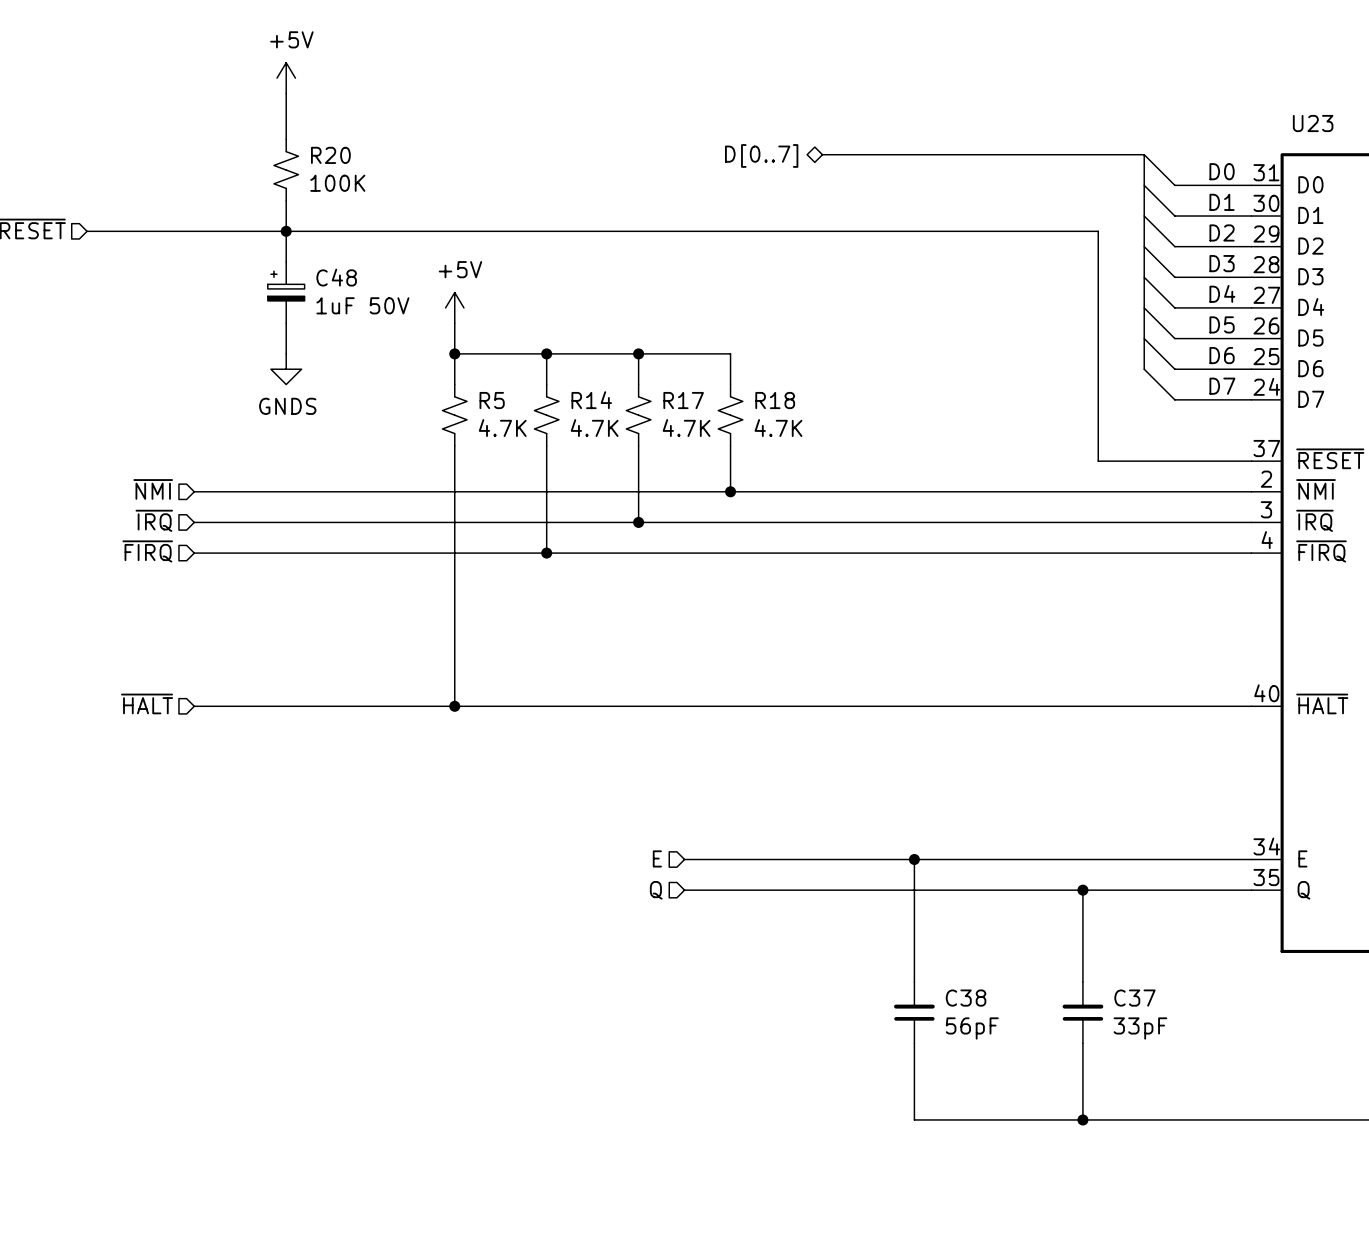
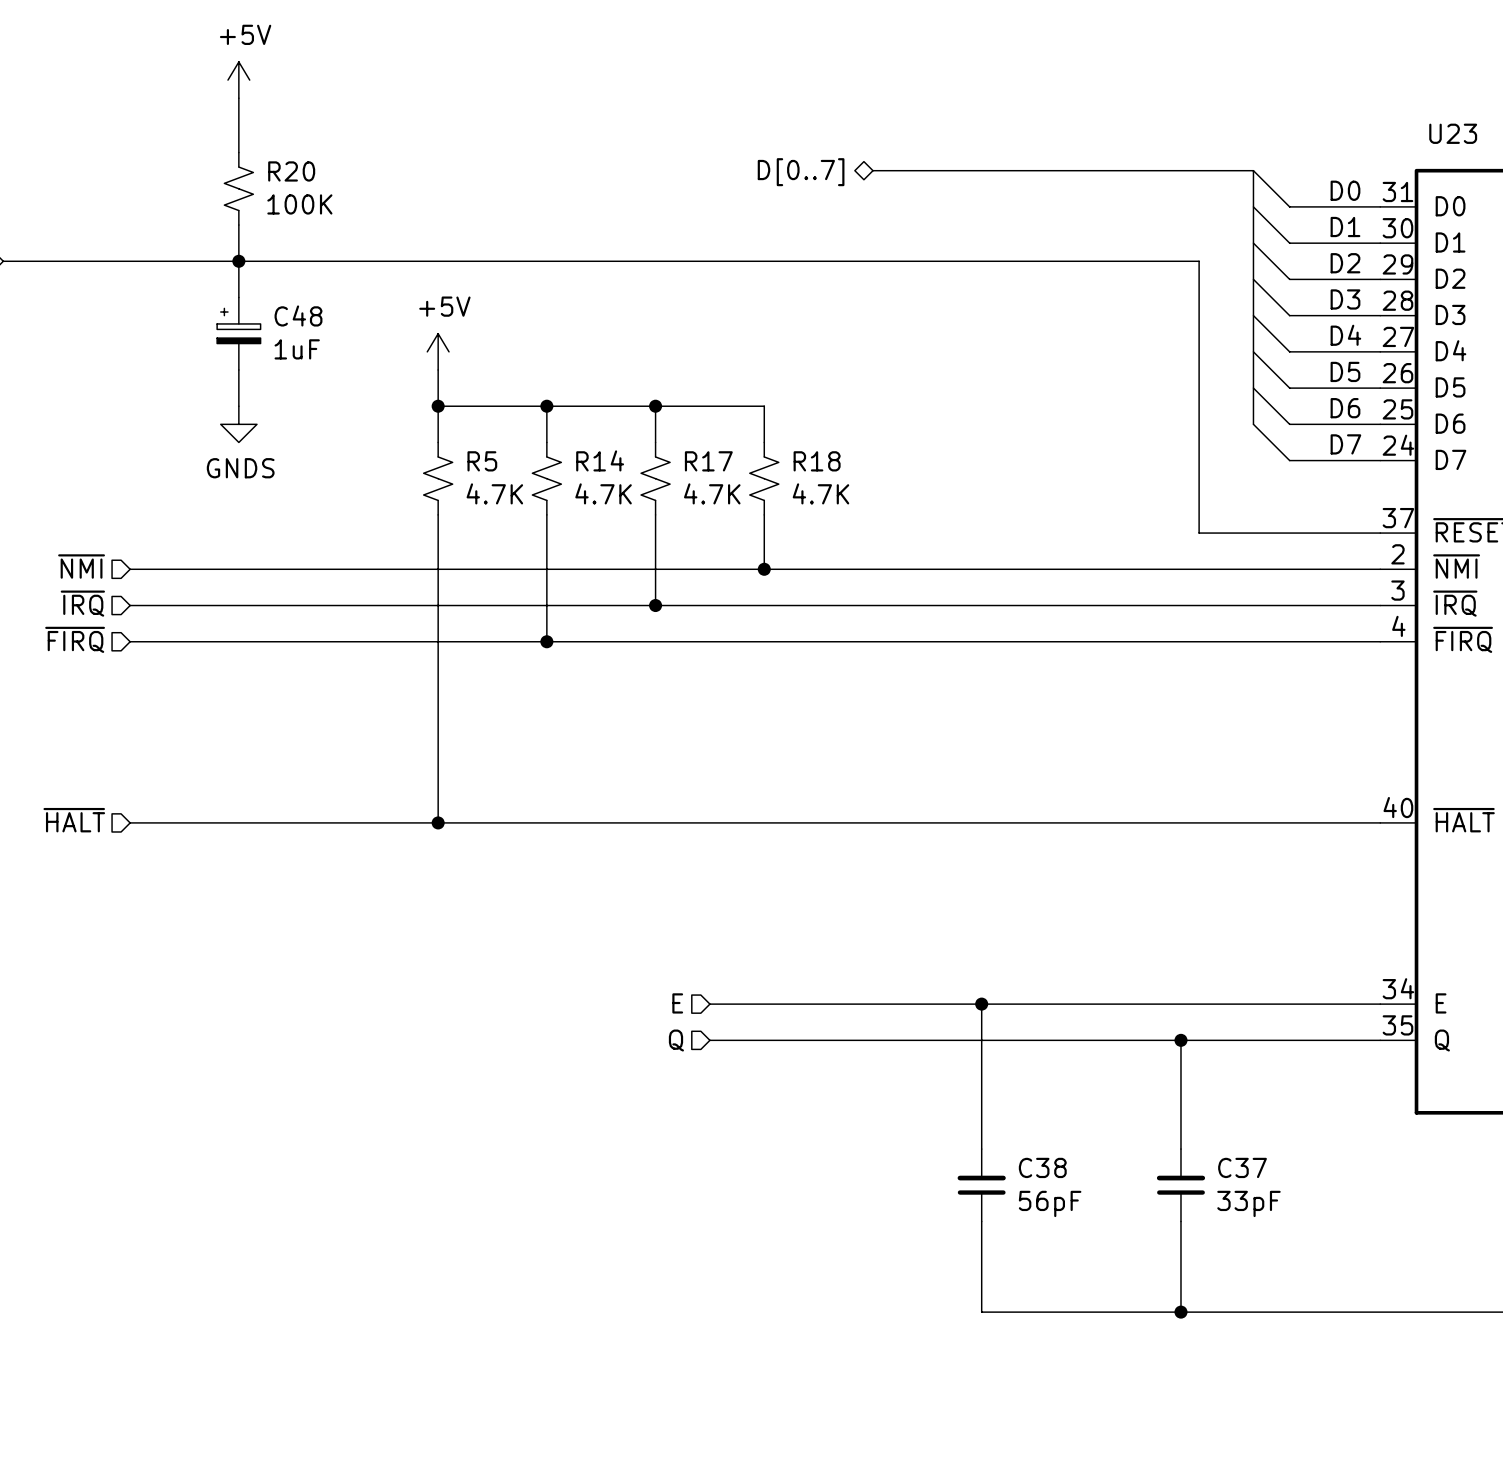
C48 value: 1uF 50V (362, 305) -> 1uF (297, 349)

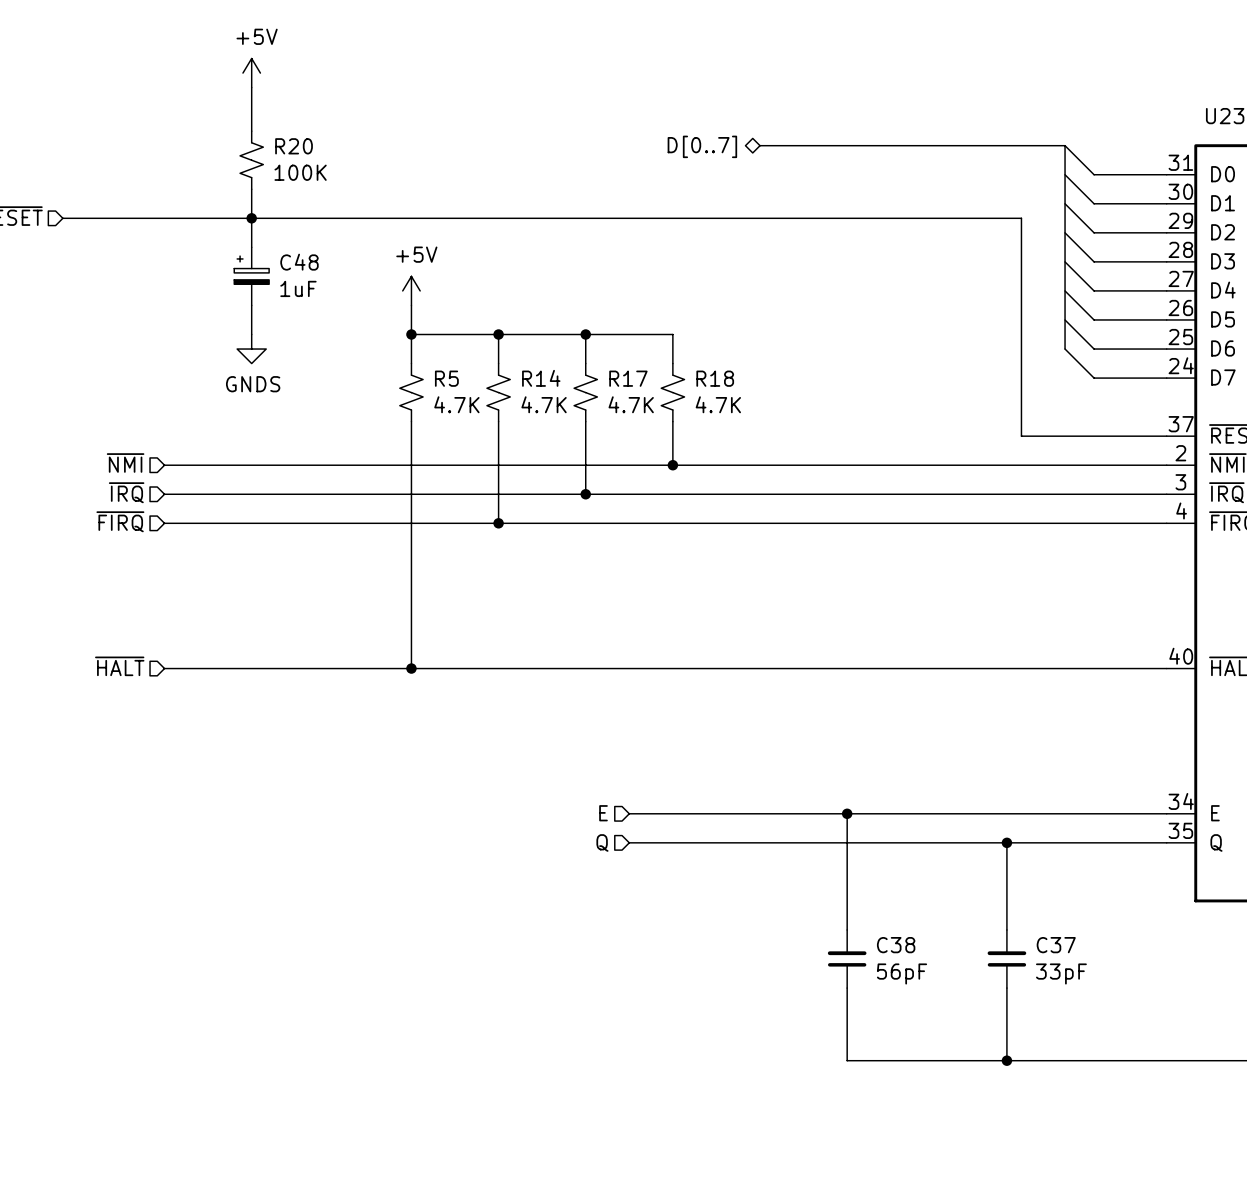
label: D0 (1345, 190) -> none
label: D1 (1345, 226) -> none
label: D2 (1345, 263) -> none
label: D3 (1345, 299) -> none
label: D4 (1345, 335) -> none
label: D5 (1345, 371) -> none
label: D6 (1345, 408) -> none
label: D7 (1345, 444) -> none

